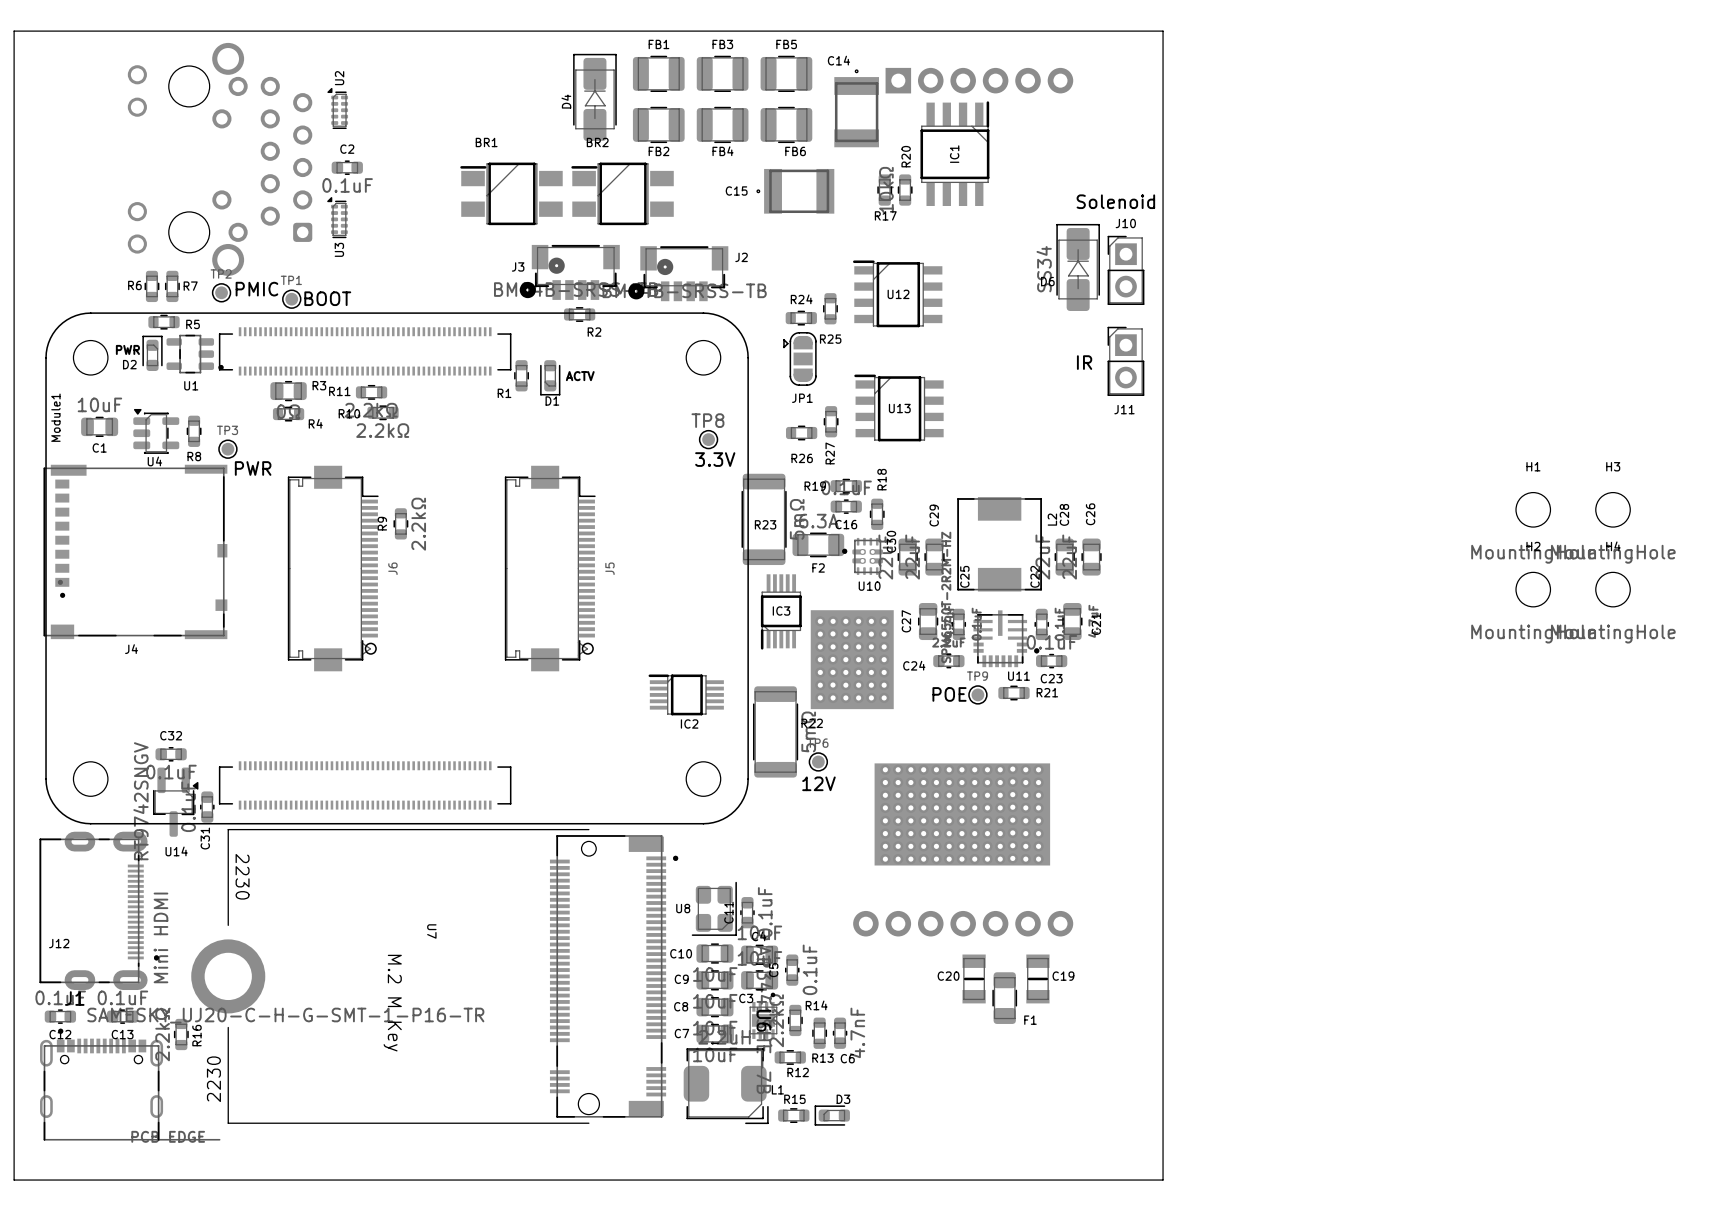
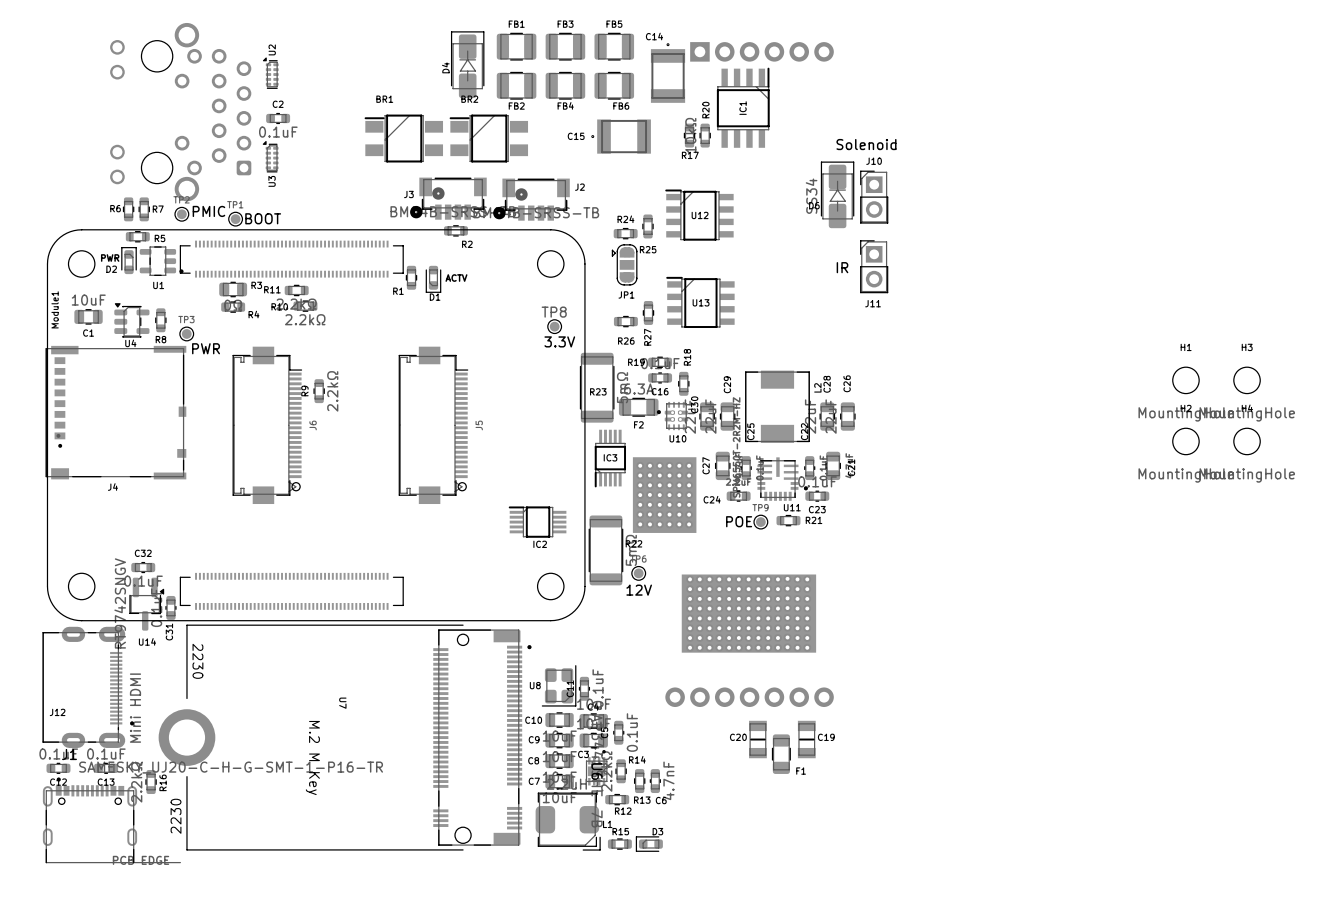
board edge: (14, 31) (1163, 31) (1163, 1180) (14, 1180) (14, 31) -> none

